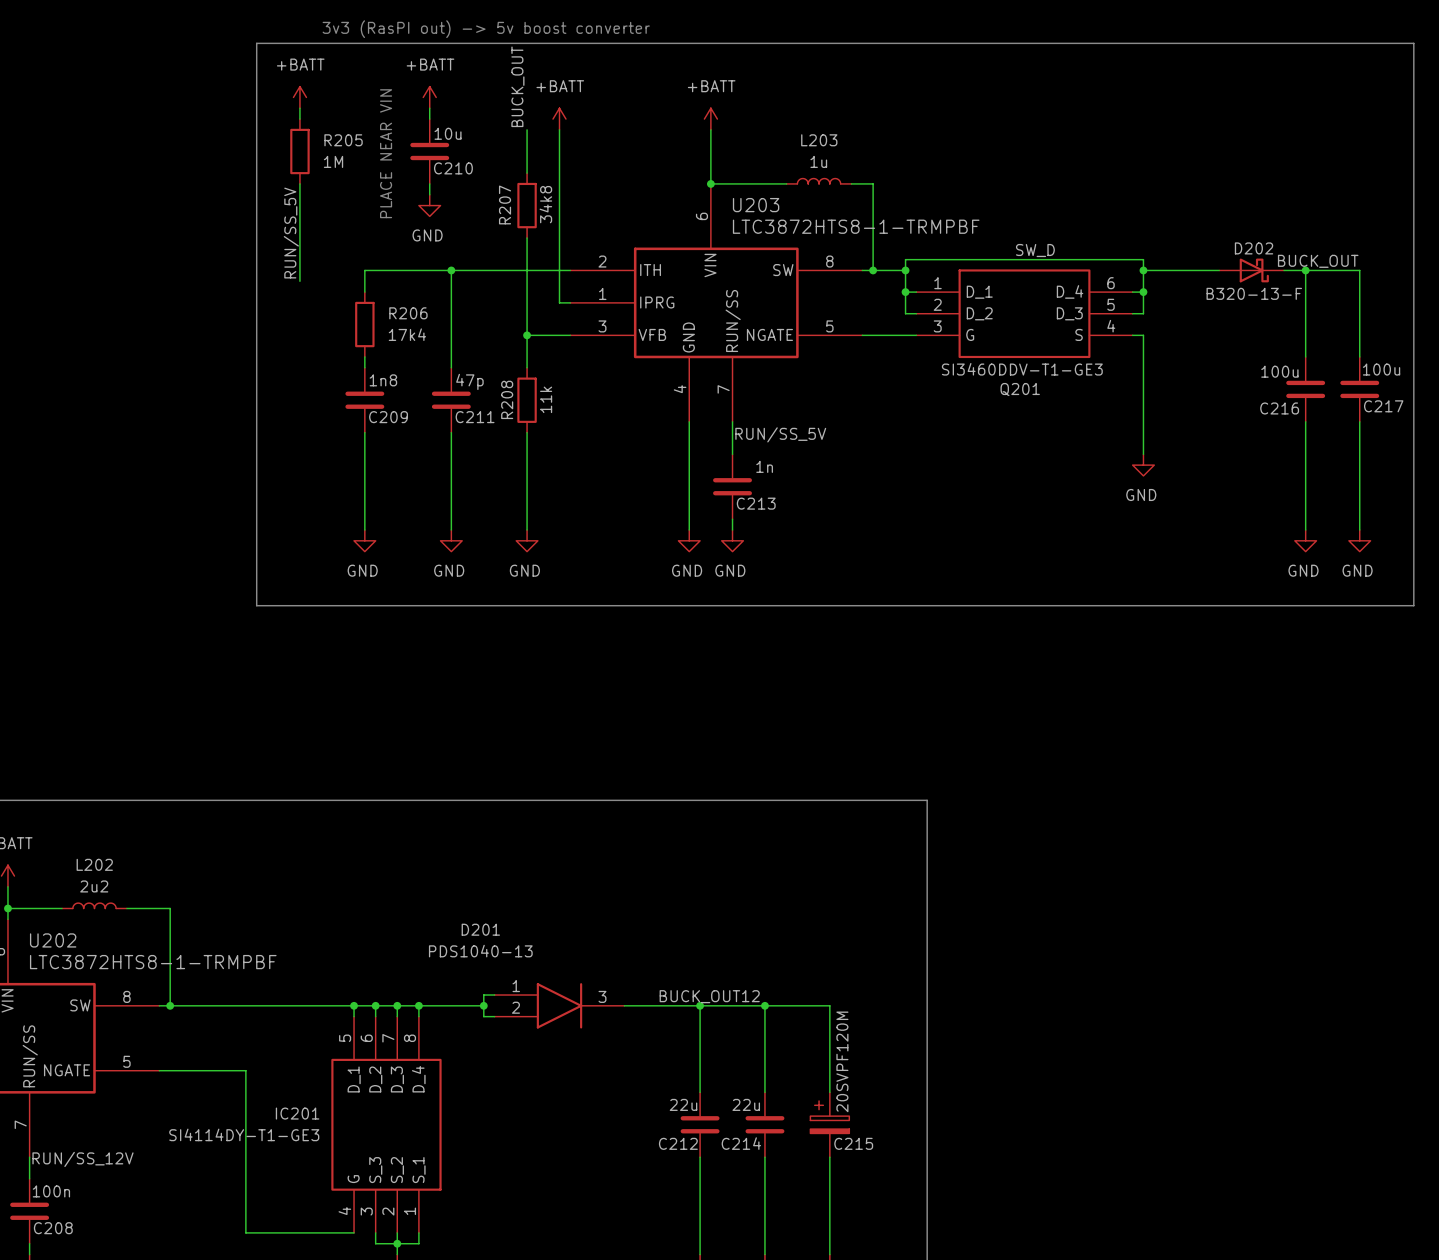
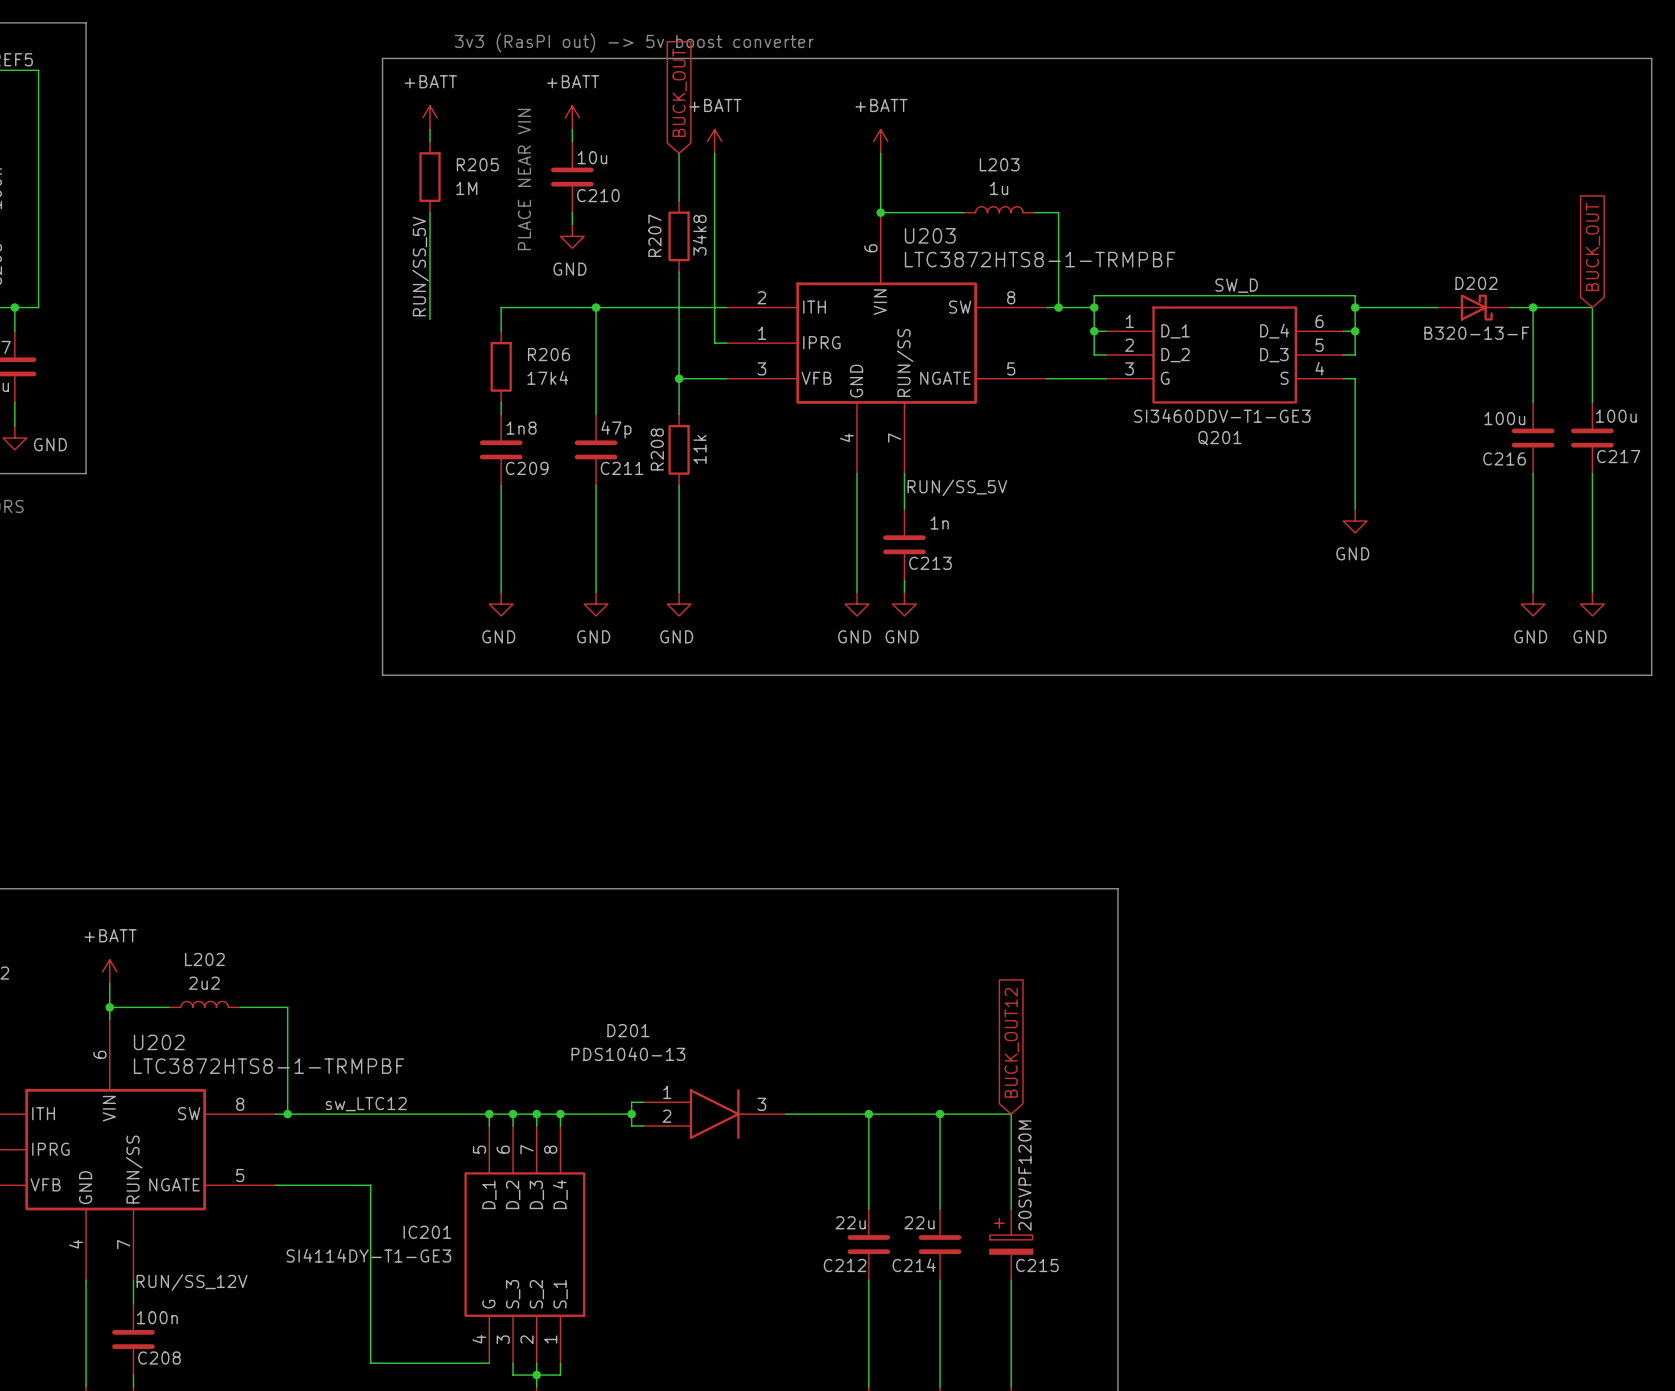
global label: none -> BUCK_OUT (679, 92)
label: BUCK_OUT (517, 86) -> none
global label: none -> BUCK_OUT (1592, 246)
label: BUCK_OUT (1318, 261) -> none
global label: none -> BUCK_OUT12 (1011, 1042)
label: none -> sw_LTC12 (366, 1104)
label: BUCK_OUT12 (709, 996) -> none

